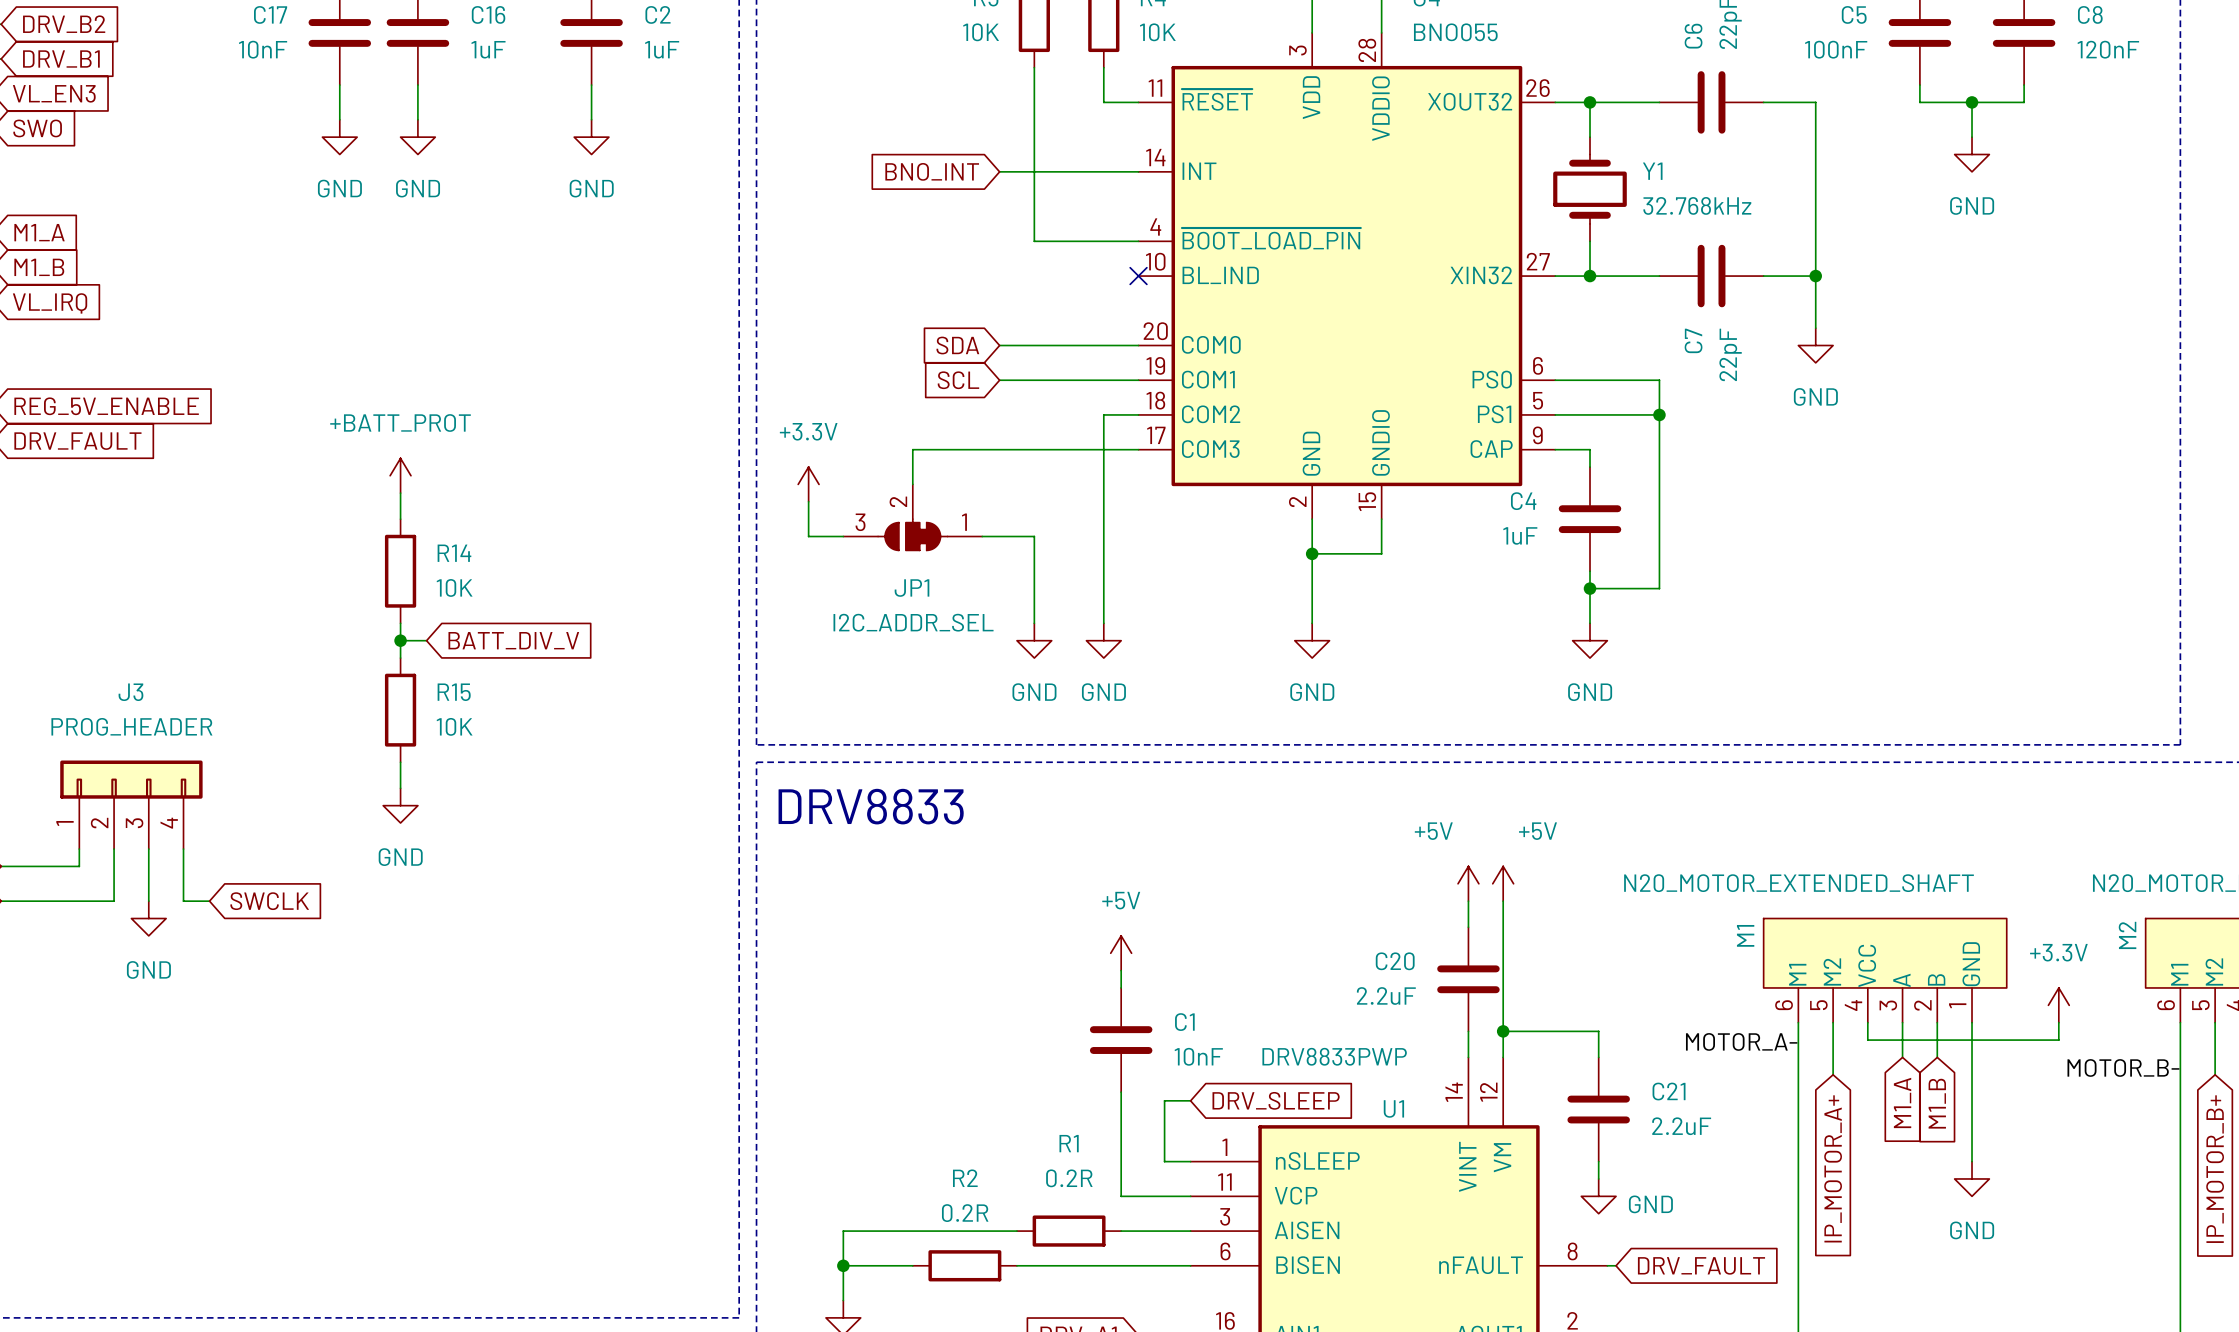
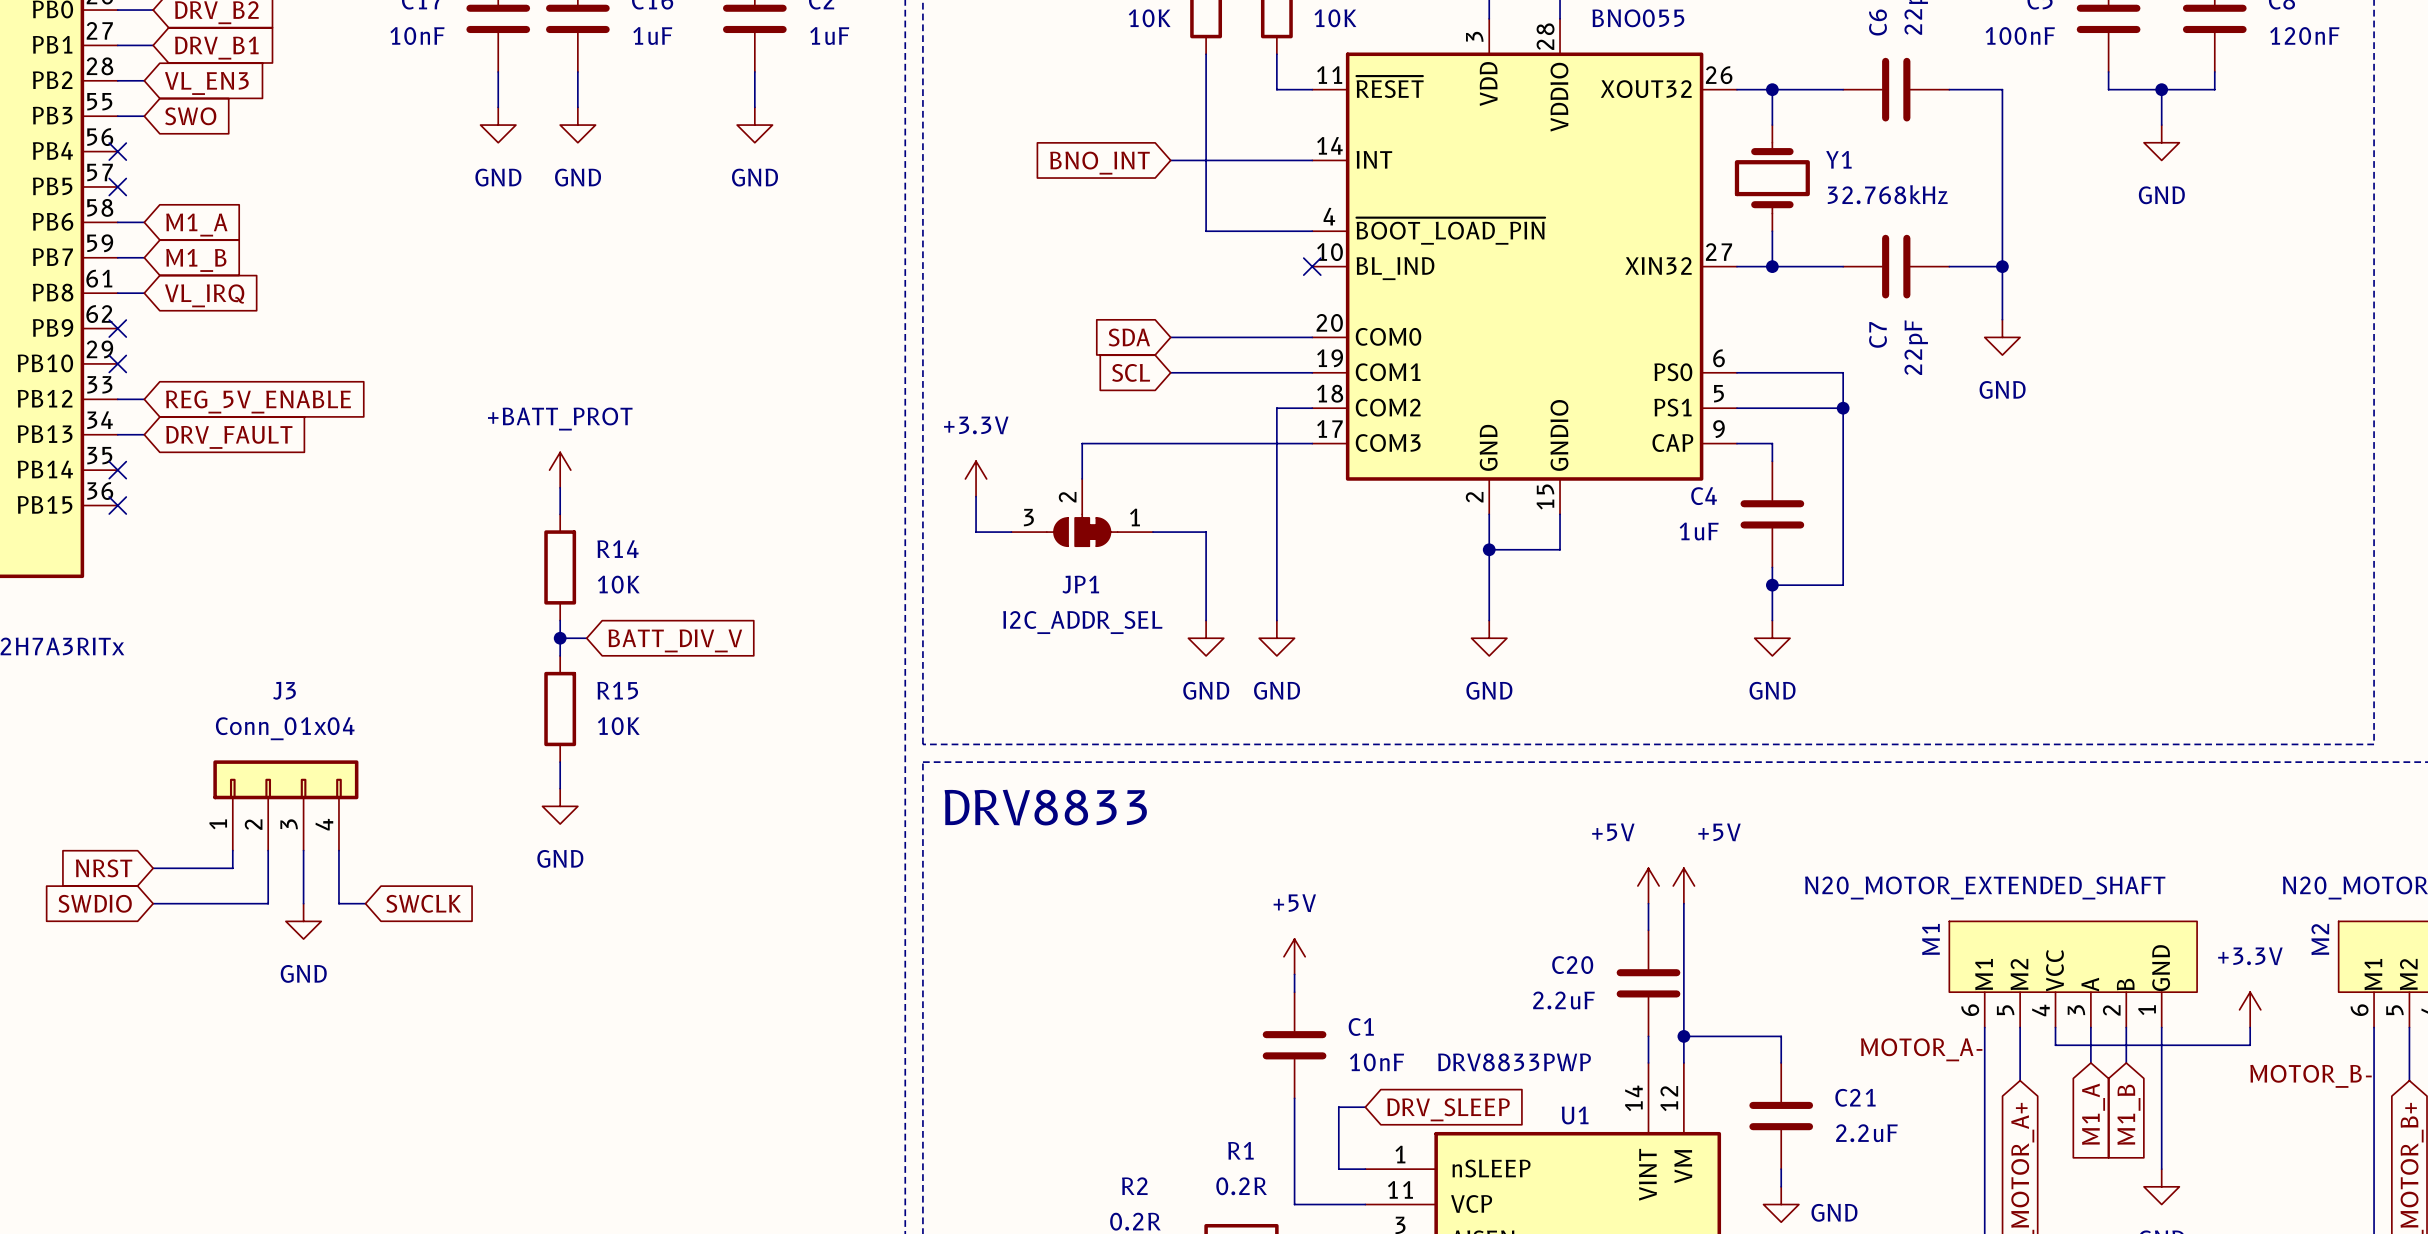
J3 value: PROG_HEADER (131, 726) -> Conn_01x04 (285, 728)

